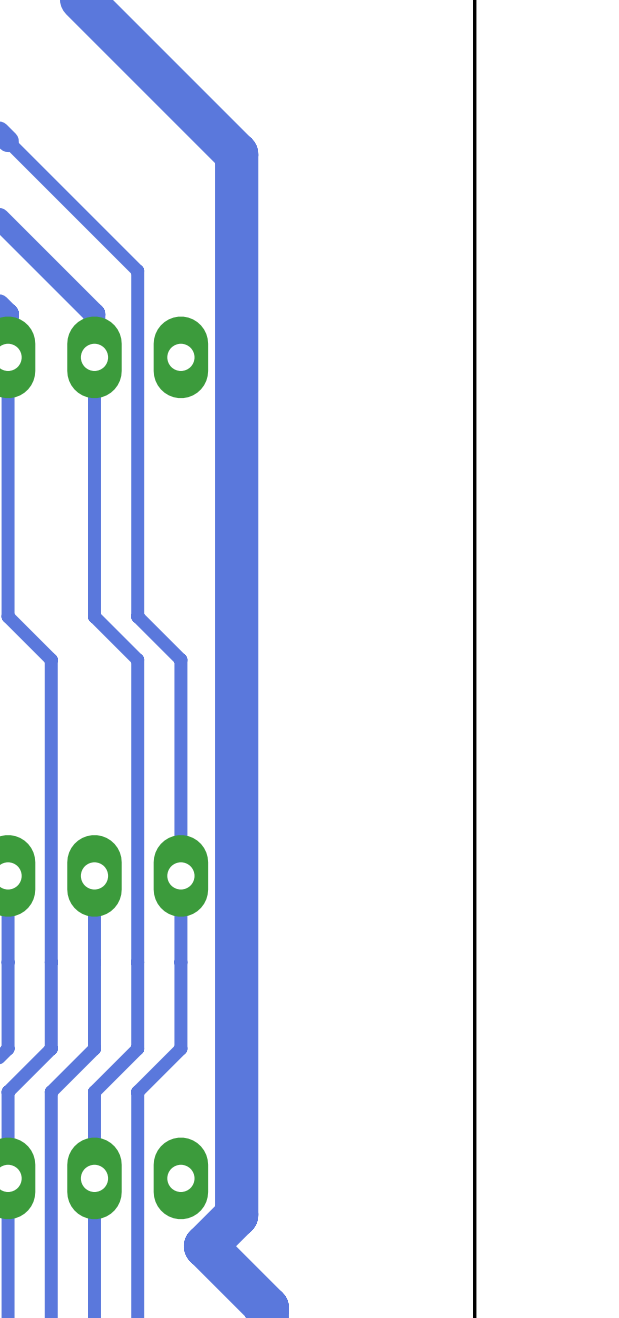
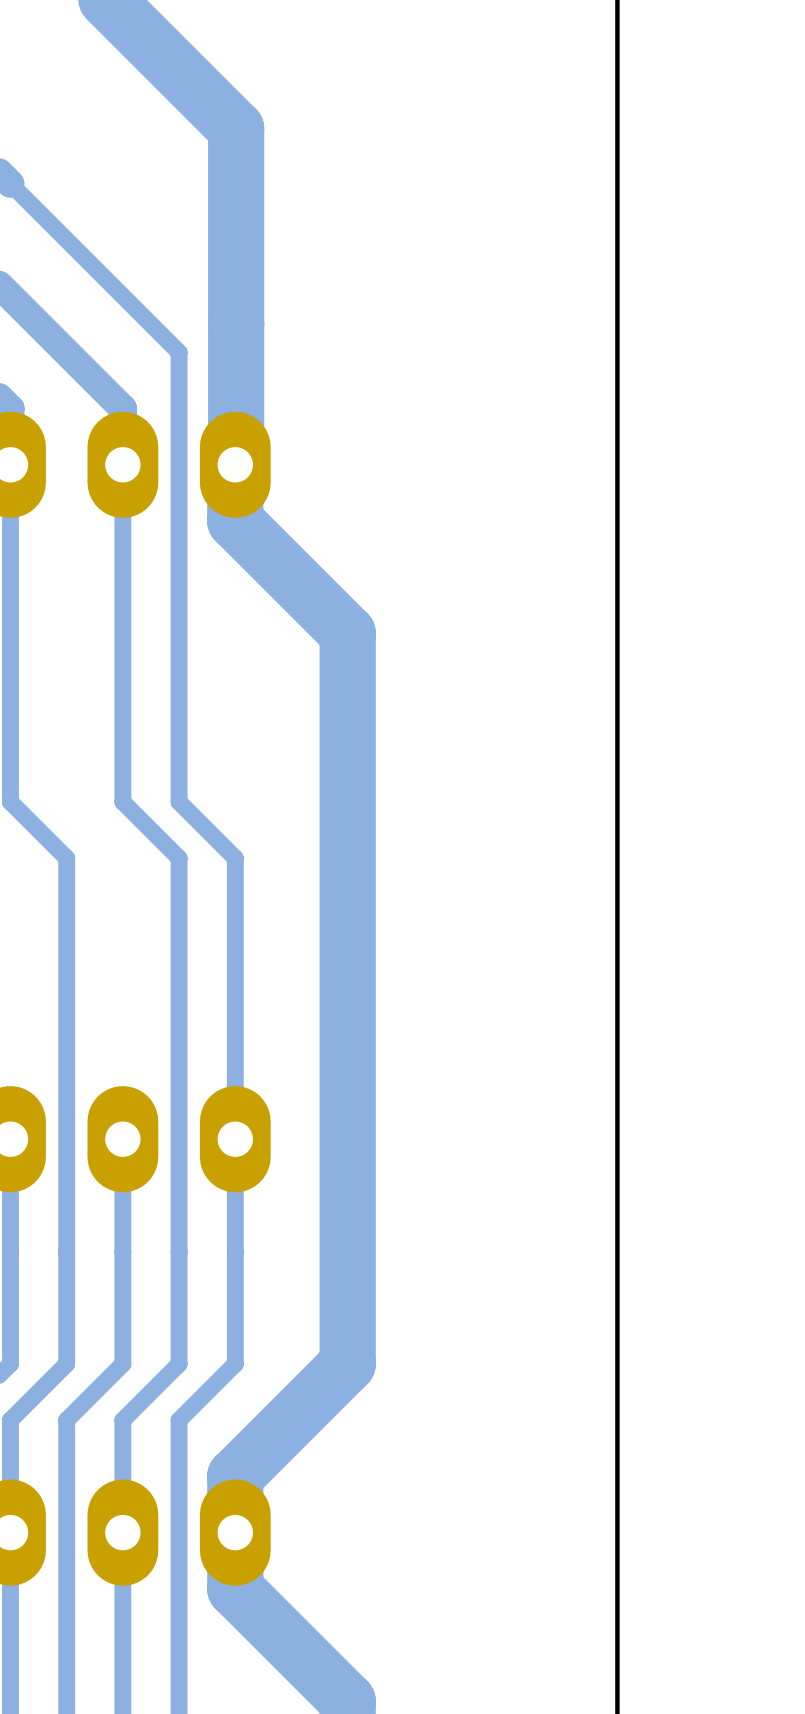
bottom track: (181, 99) (236, 154) (236, 1215) (205, 1246) -> (236, 128) (235, 520) (347, 633) (347, 1364) (235, 1476) (235, 1588) (267, 1620)

